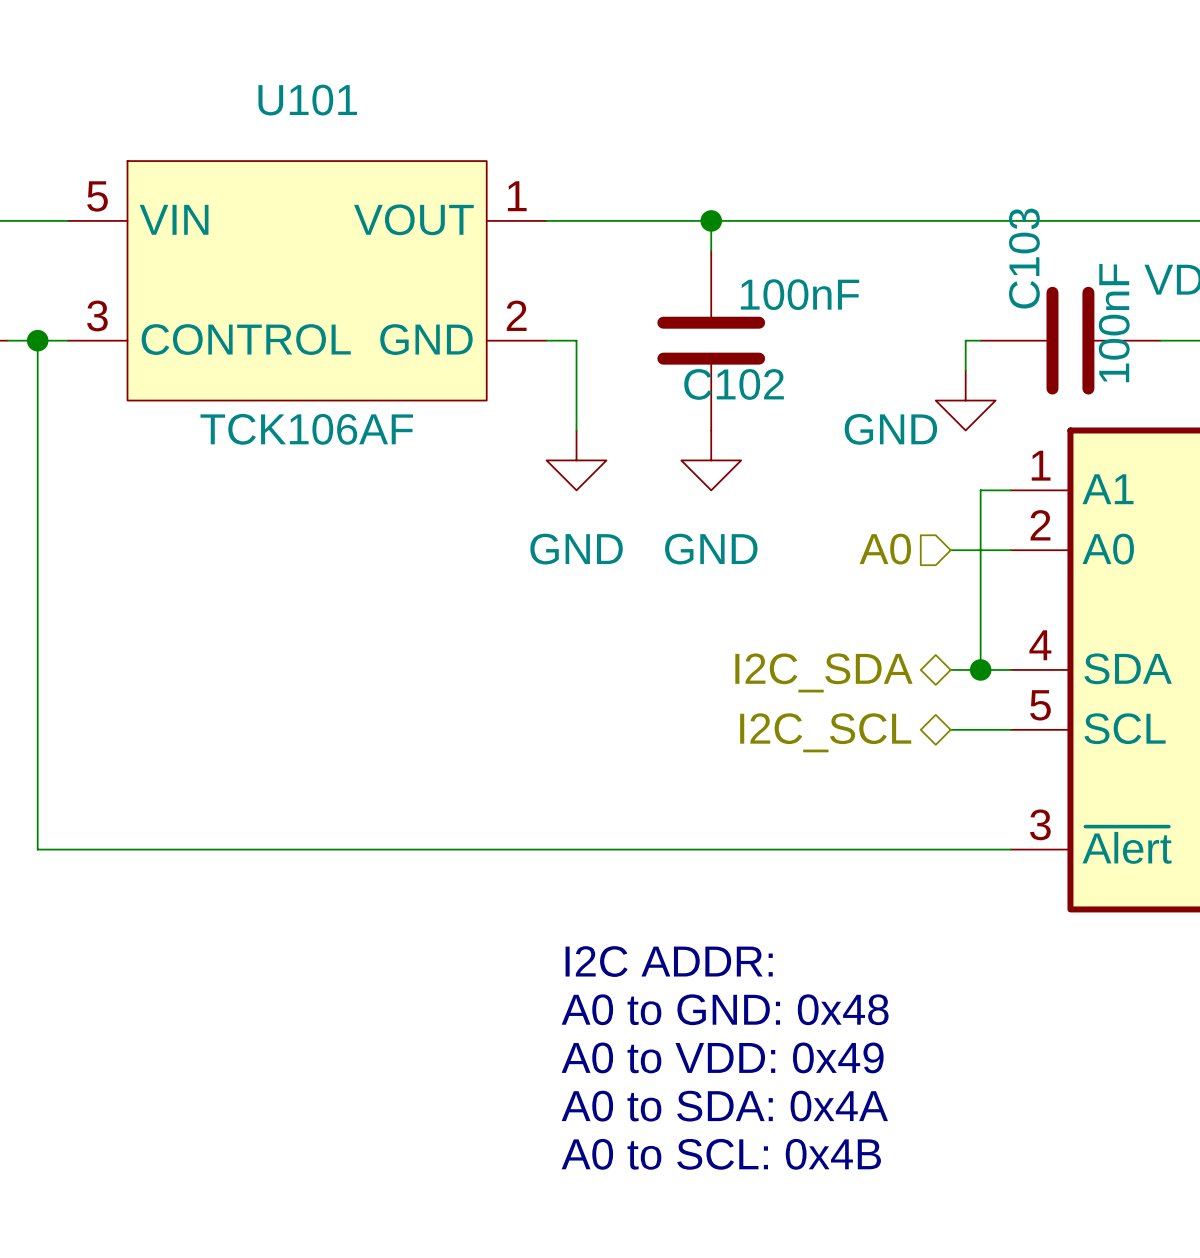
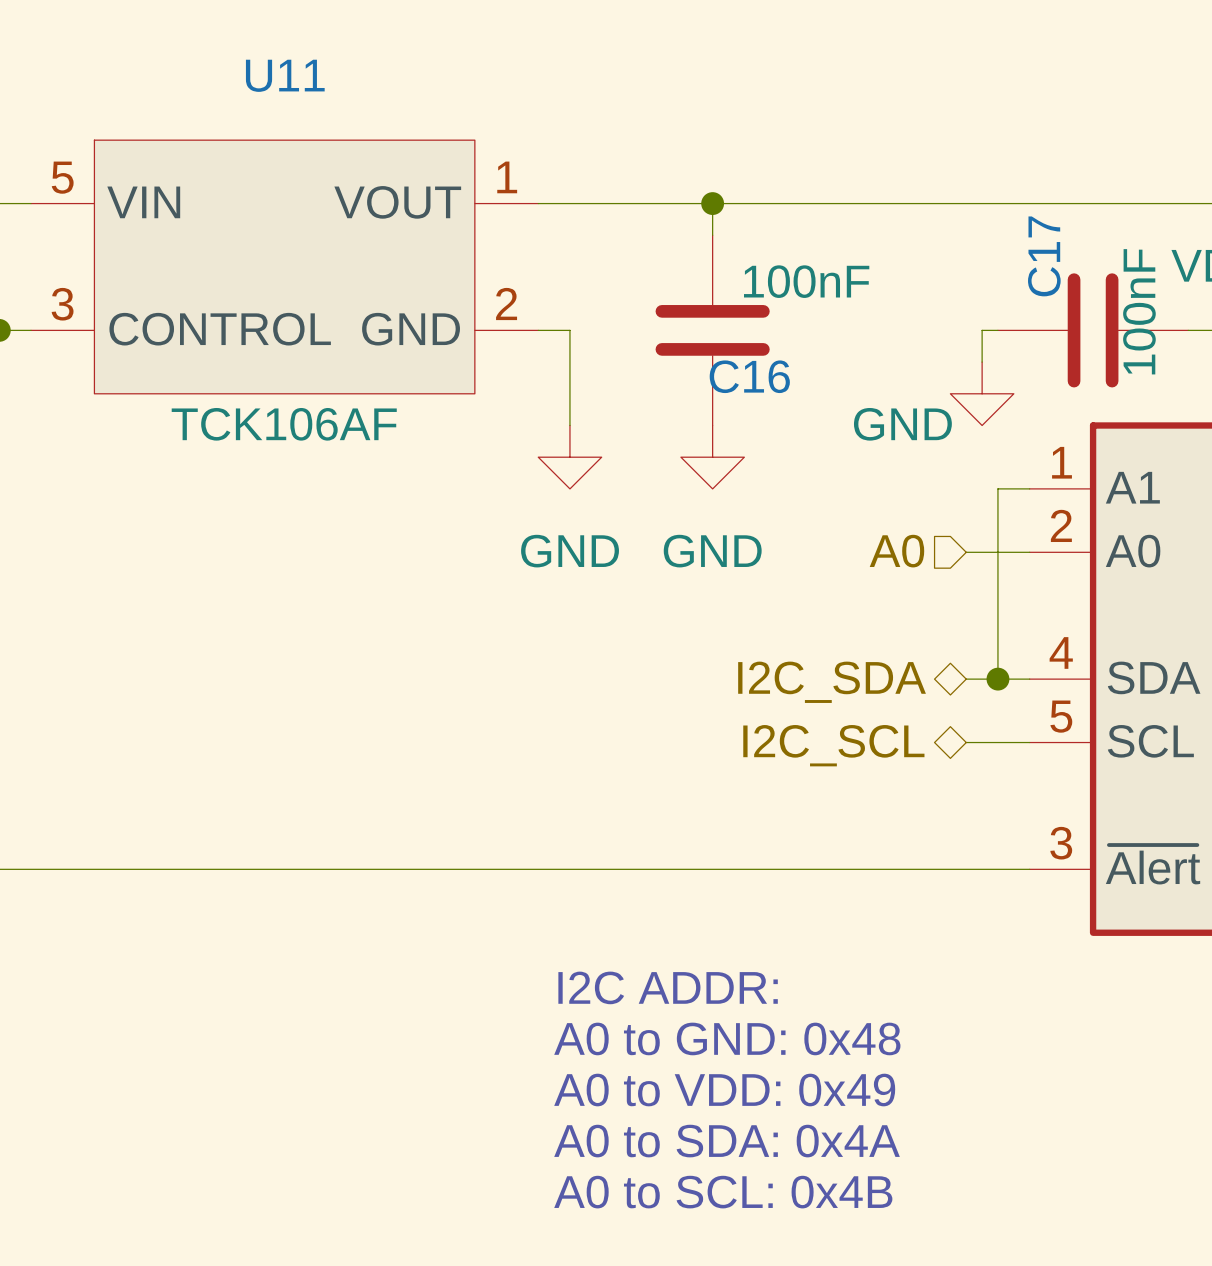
U101 name: U101 (307, 100) -> U11 (285, 75)
C103 name: C103 (1024, 258) -> C17 (1044, 256)
C102 name: C102 (734, 384) -> C16 (749, 376)

